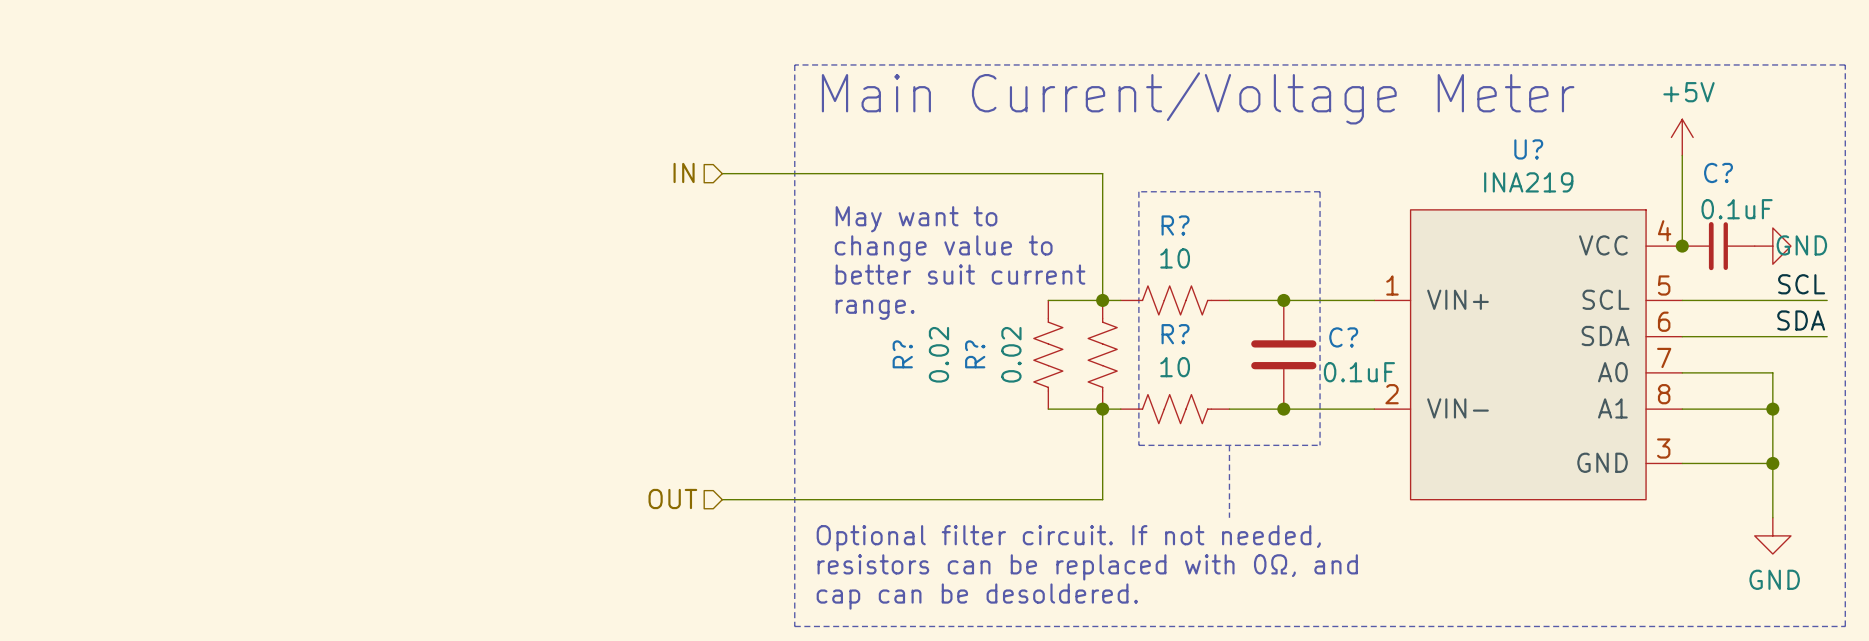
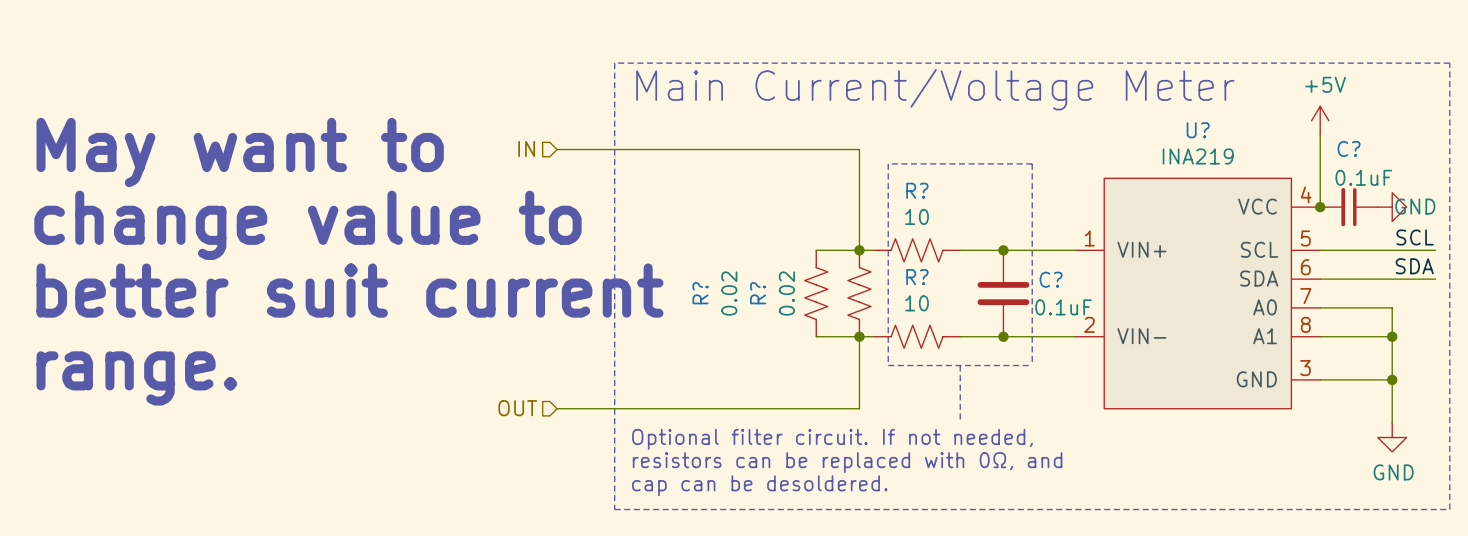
text: none -> May want to (240, 152)
text: May want to (916, 219) -> none
text: change value to (943, 248) -> none
text: none -> change value to (307, 225)
text: better suit current (960, 274) -> none
text: range. (875, 309) -> none
text: none -> better suit current (349, 290)
text: none -> range. (136, 378)

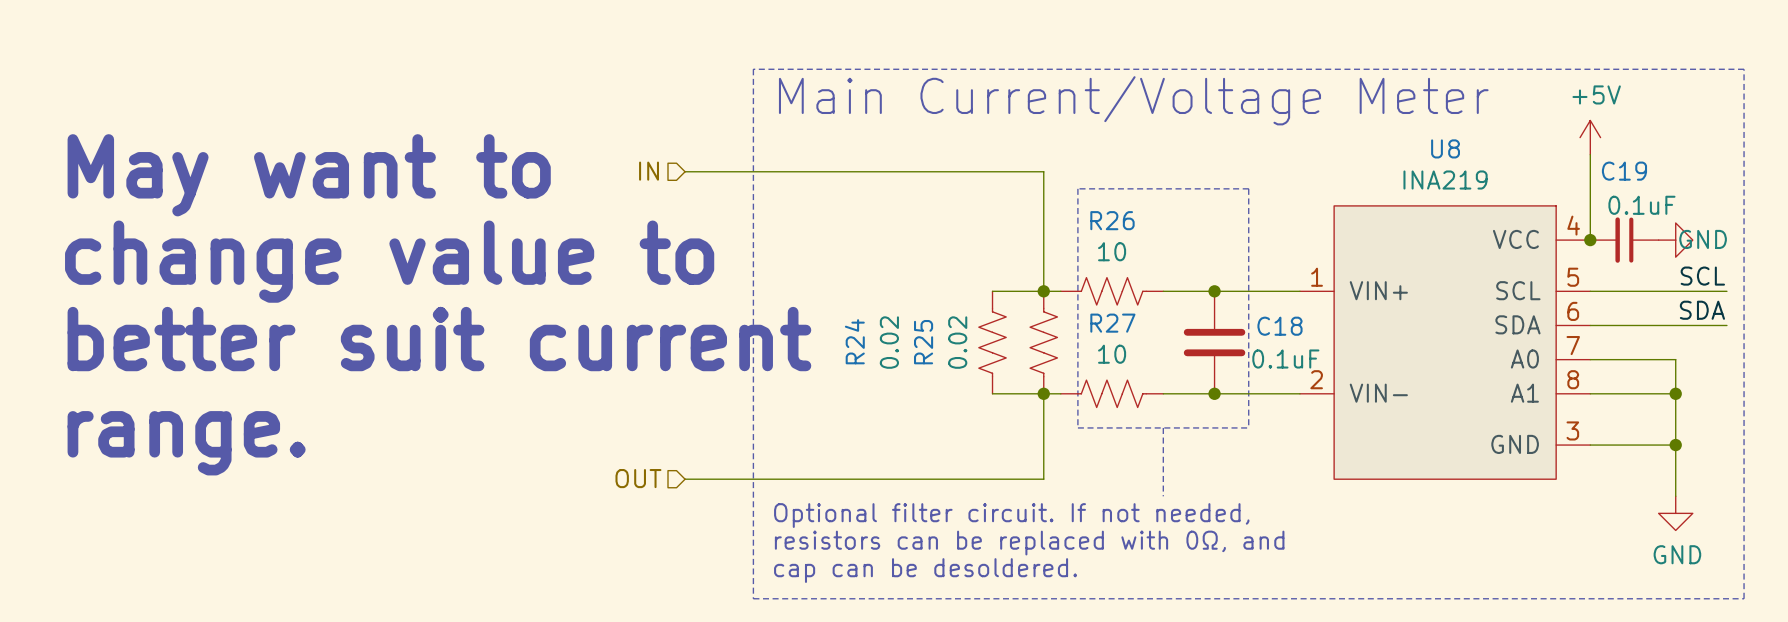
U? name: U? (1198, 130) -> U8 (1445, 148)
C? name: C? (1349, 149) -> C19 (1624, 171)
R? name: R? (917, 190) -> R26 (1112, 220)
R? name: R? (917, 277) -> R27 (1112, 323)
C? name: C? (1051, 279) -> C18 (1279, 326)
R? name: R? (700, 293) -> R24 (854, 341)
R? name: R? (758, 293) -> R25 (923, 342)

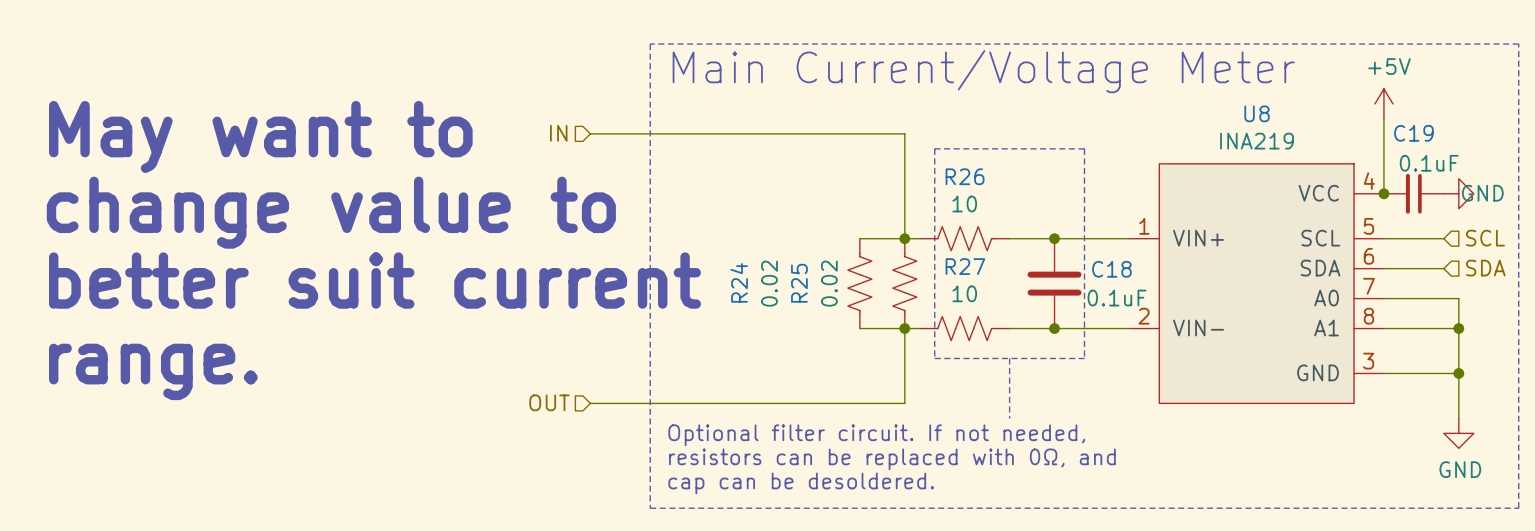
label: SCL (1702, 276) -> none
hierarchical label: none -> SCL (1485, 238)
wire: (1658, 291) (1726, 291) -> none
label: SDA (1702, 310) -> none
hierarchical label: none -> SDA (1485, 268)
wire: (1658, 325) (1726, 325) -> none

